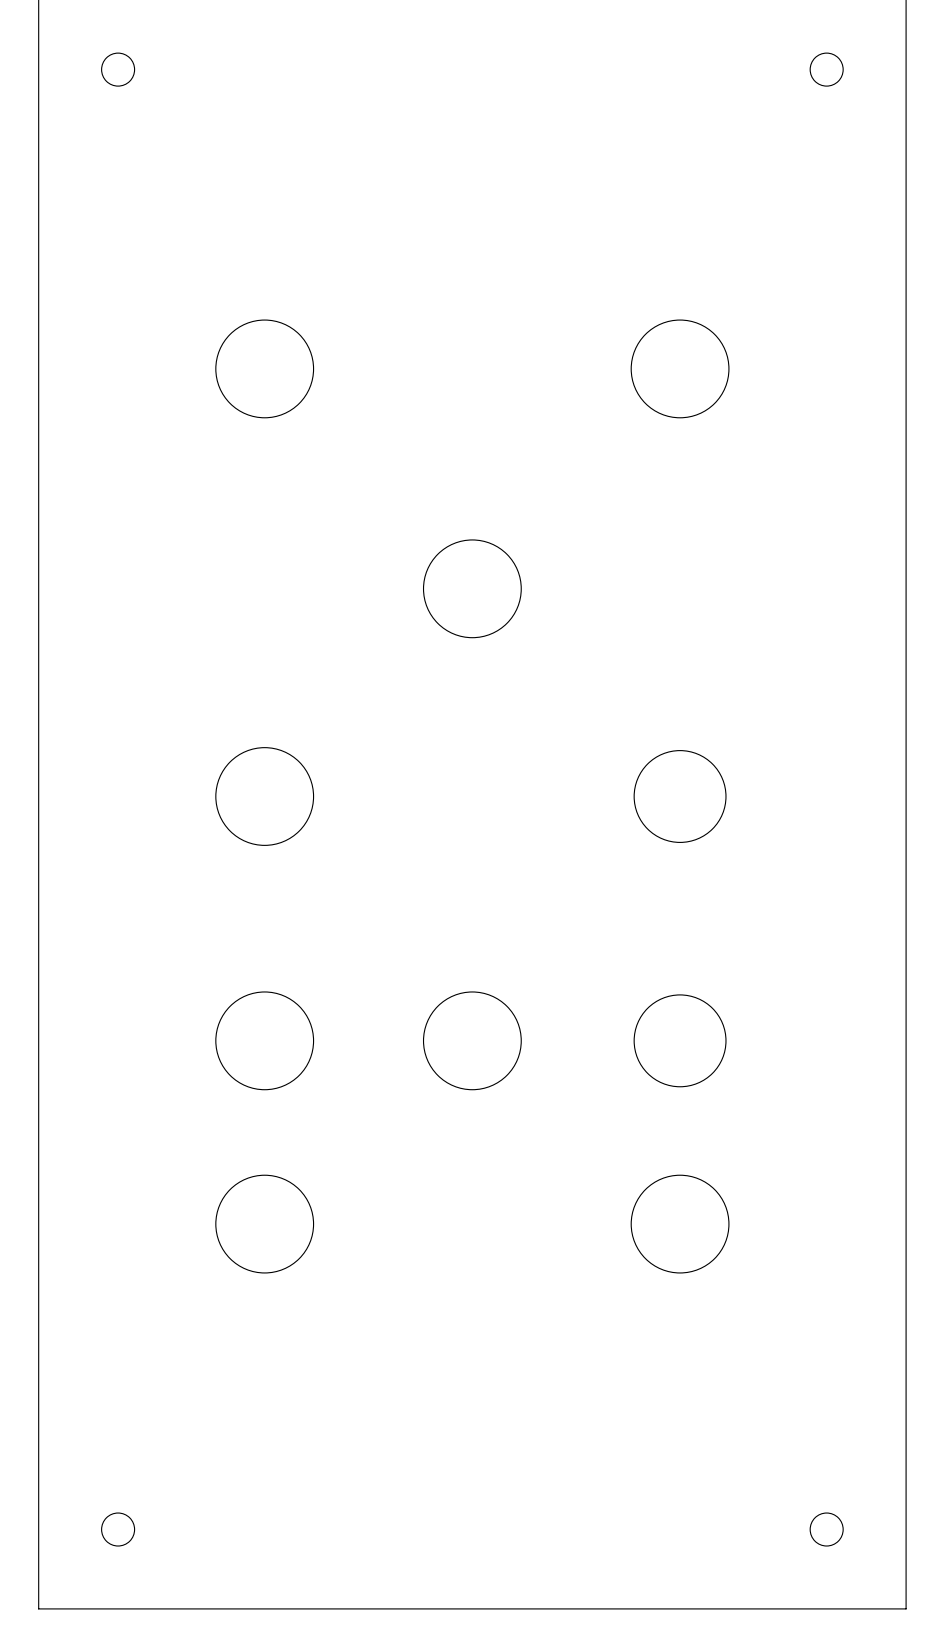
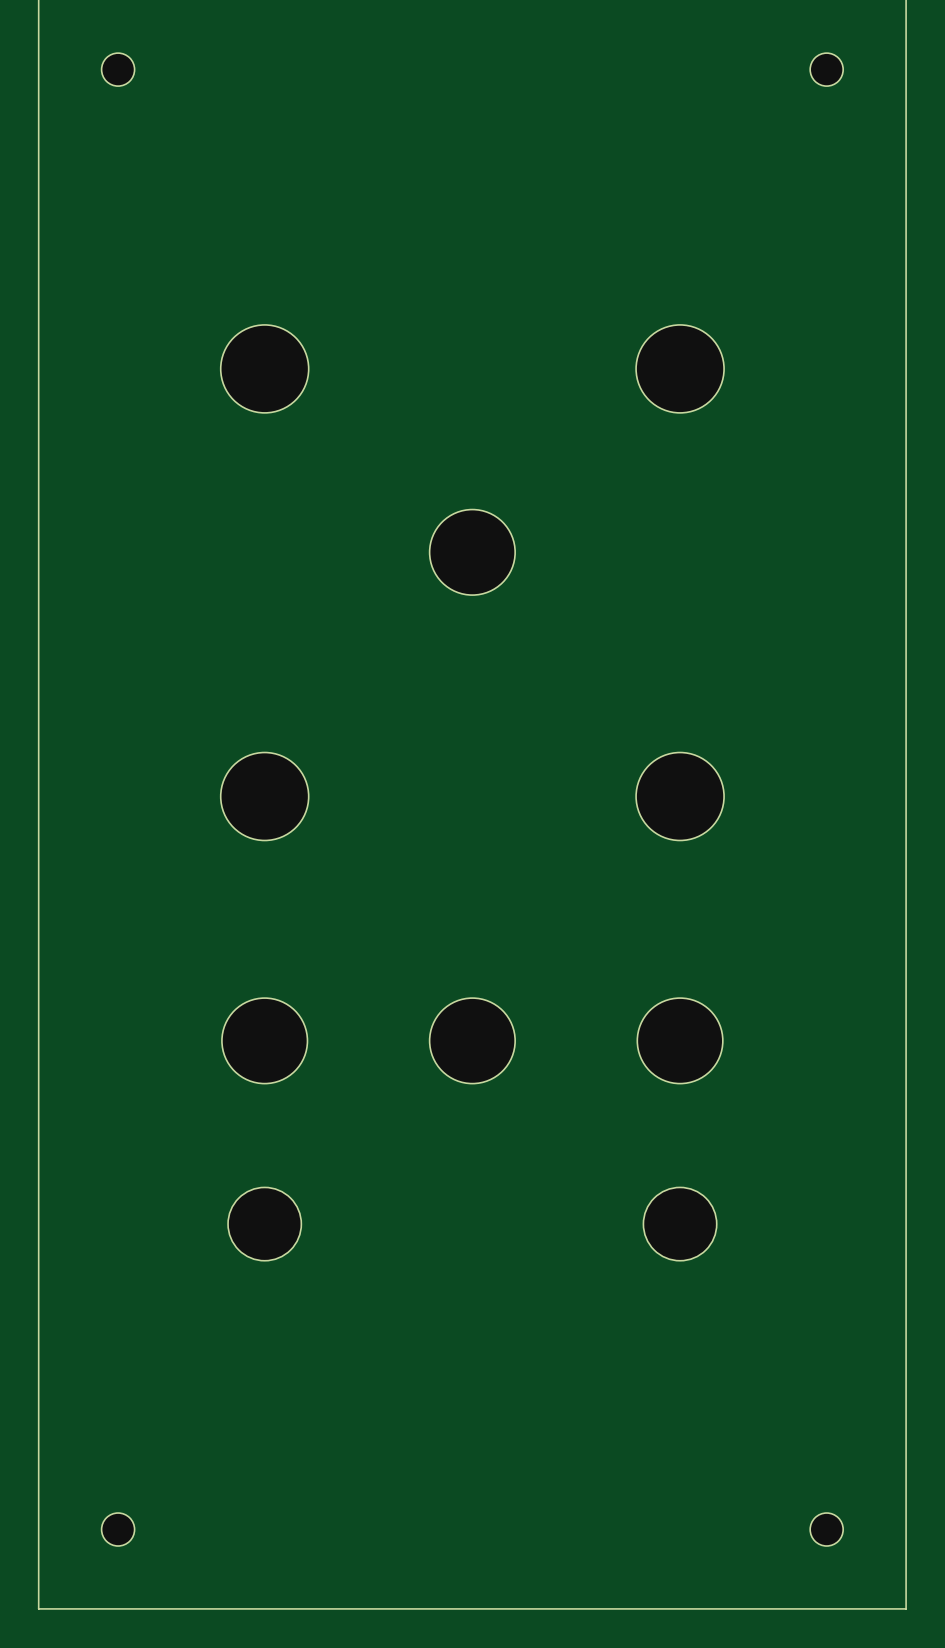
round board edge: [215, 319, 314, 419] -> none
round board edge: [630, 319, 730, 419] -> none
part: none -> (264, 368)
part: none -> (680, 368)
round board edge: [423, 539, 522, 638] -> none
part: none -> (472, 552)
round board edge: [215, 747, 314, 846] -> none
round board edge: [633, 750, 727, 843] -> none
part: none -> (264, 796)
part: none -> (680, 796)
round board edge: [215, 991, 314, 1091] -> none
round board edge: [423, 991, 522, 1091] -> none
round board edge: [633, 994, 727, 1088] -> none
part: none -> (264, 1040)
part: none -> (472, 1040)
part: none -> (680, 1040)
round board edge: [215, 1174, 314, 1274] -> none
round board edge: [630, 1174, 730, 1274] -> none
part: none -> (264, 1224)
part: none -> (680, 1224)

